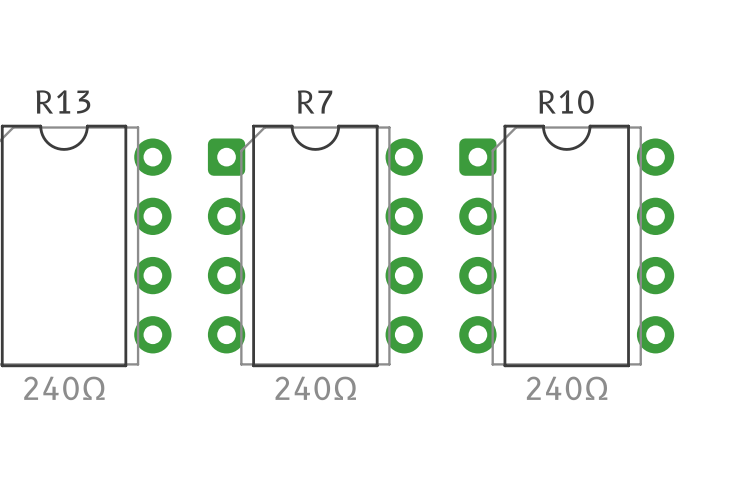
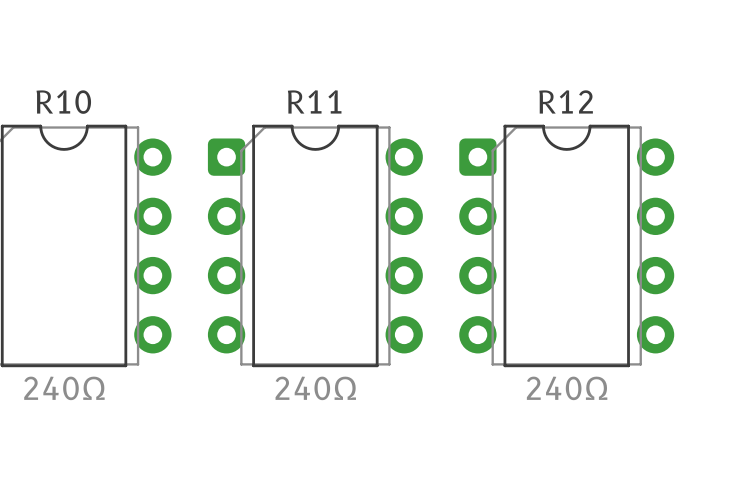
R13 name: R13 (63, 101) -> R10 (63, 102)
R7 name: R7 (315, 101) -> R11 (314, 101)
R10 name: R10 (566, 102) -> R12 (566, 101)

